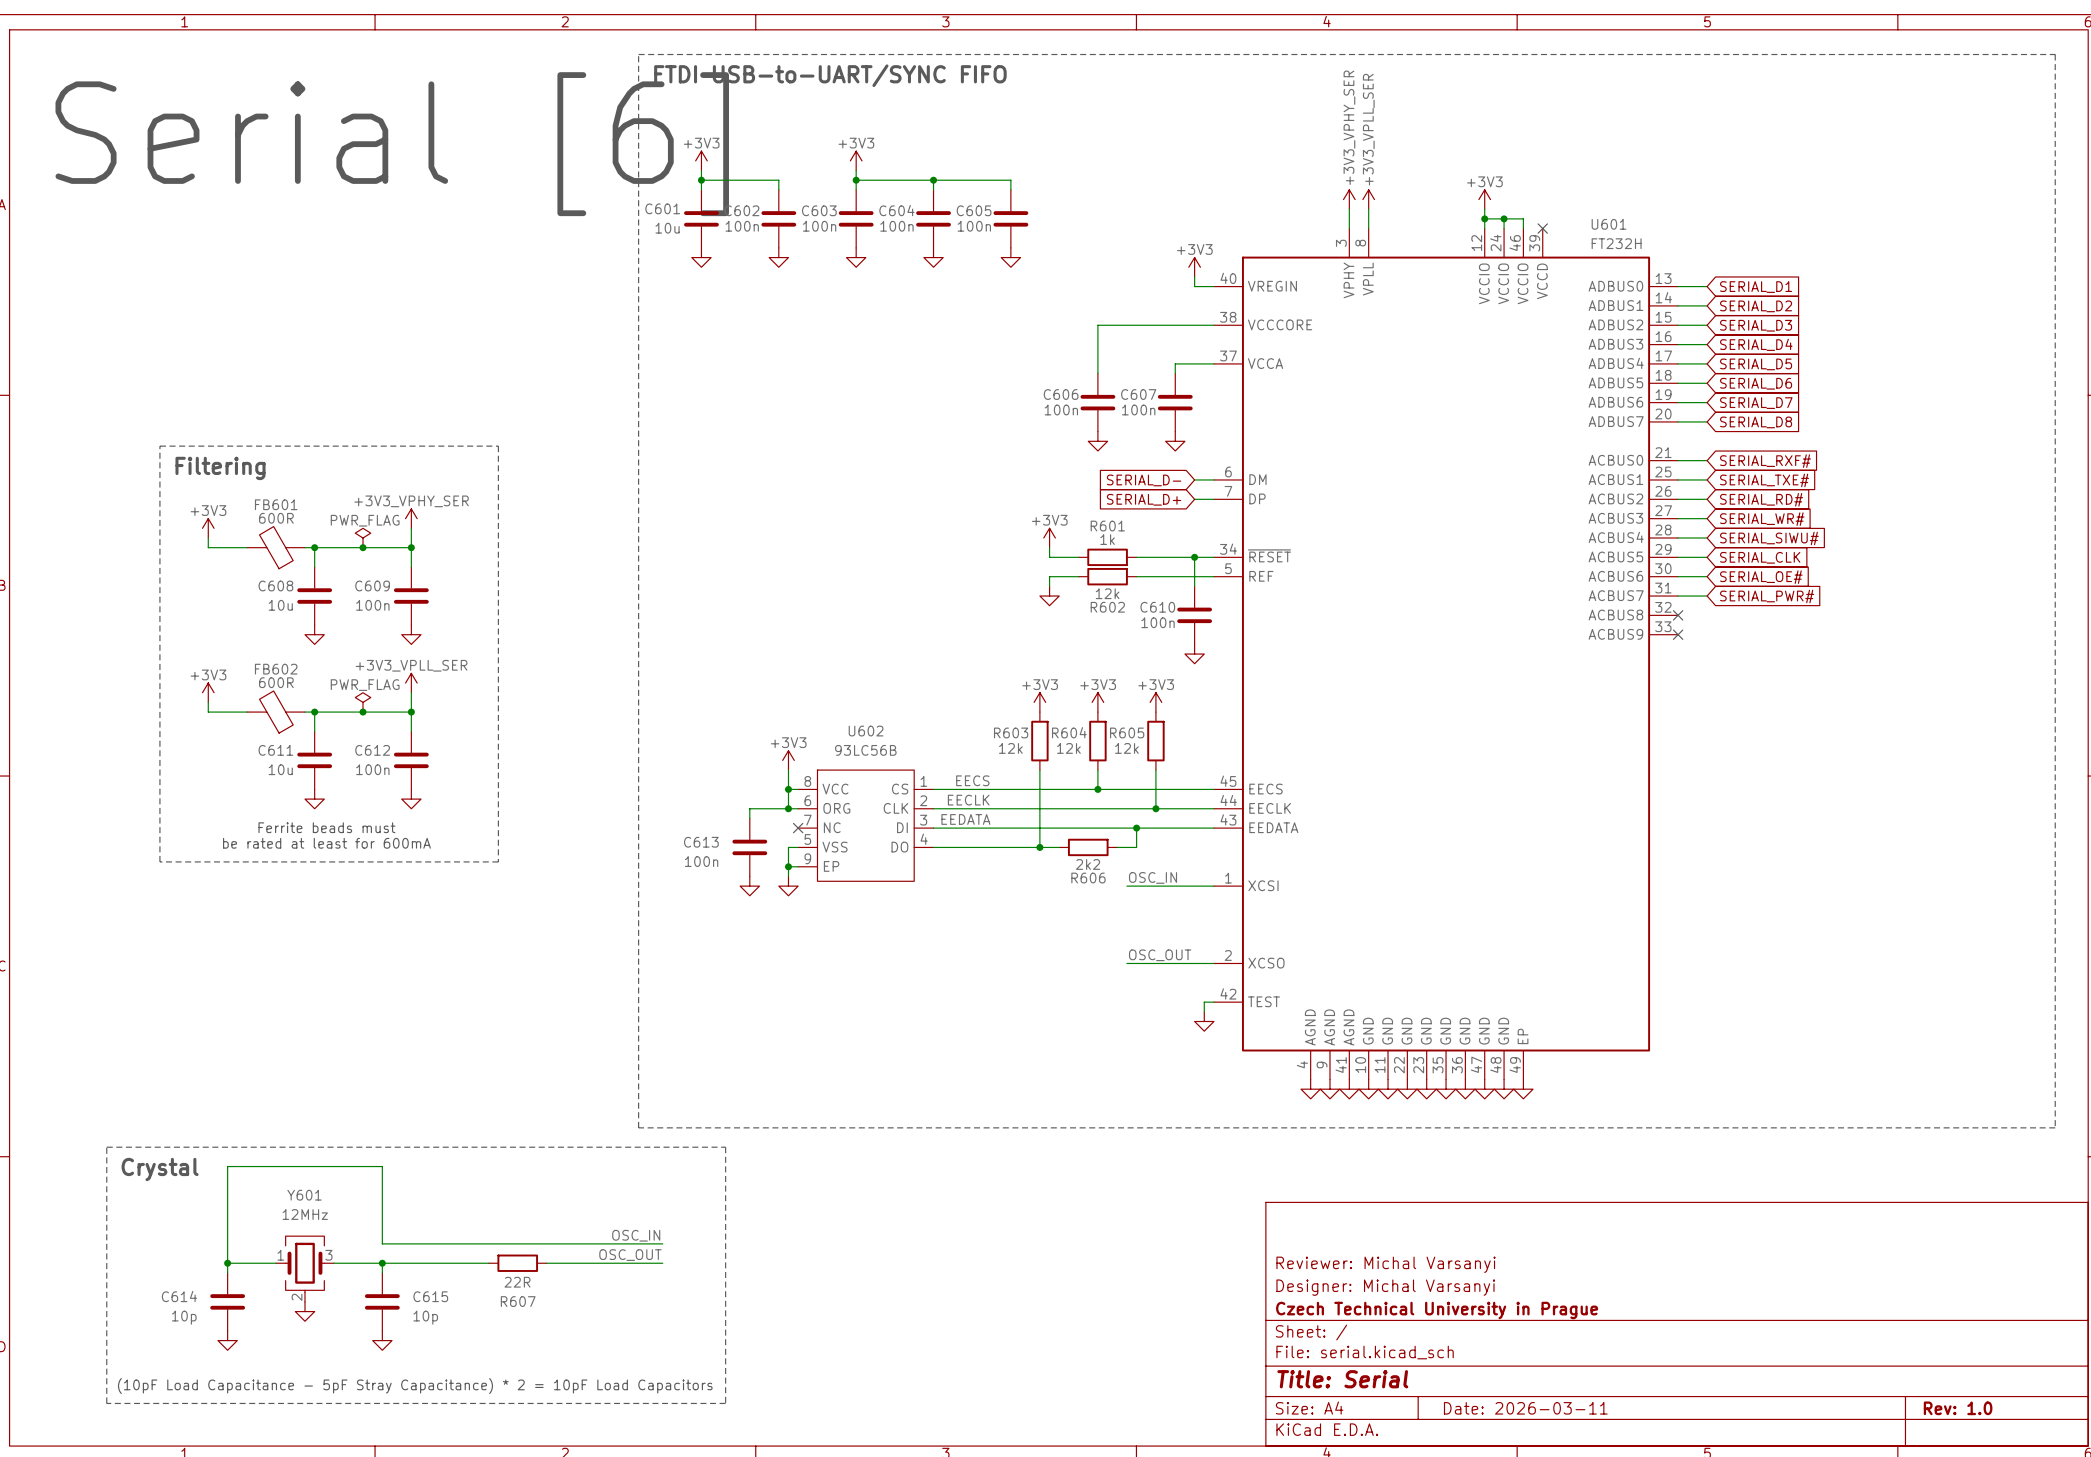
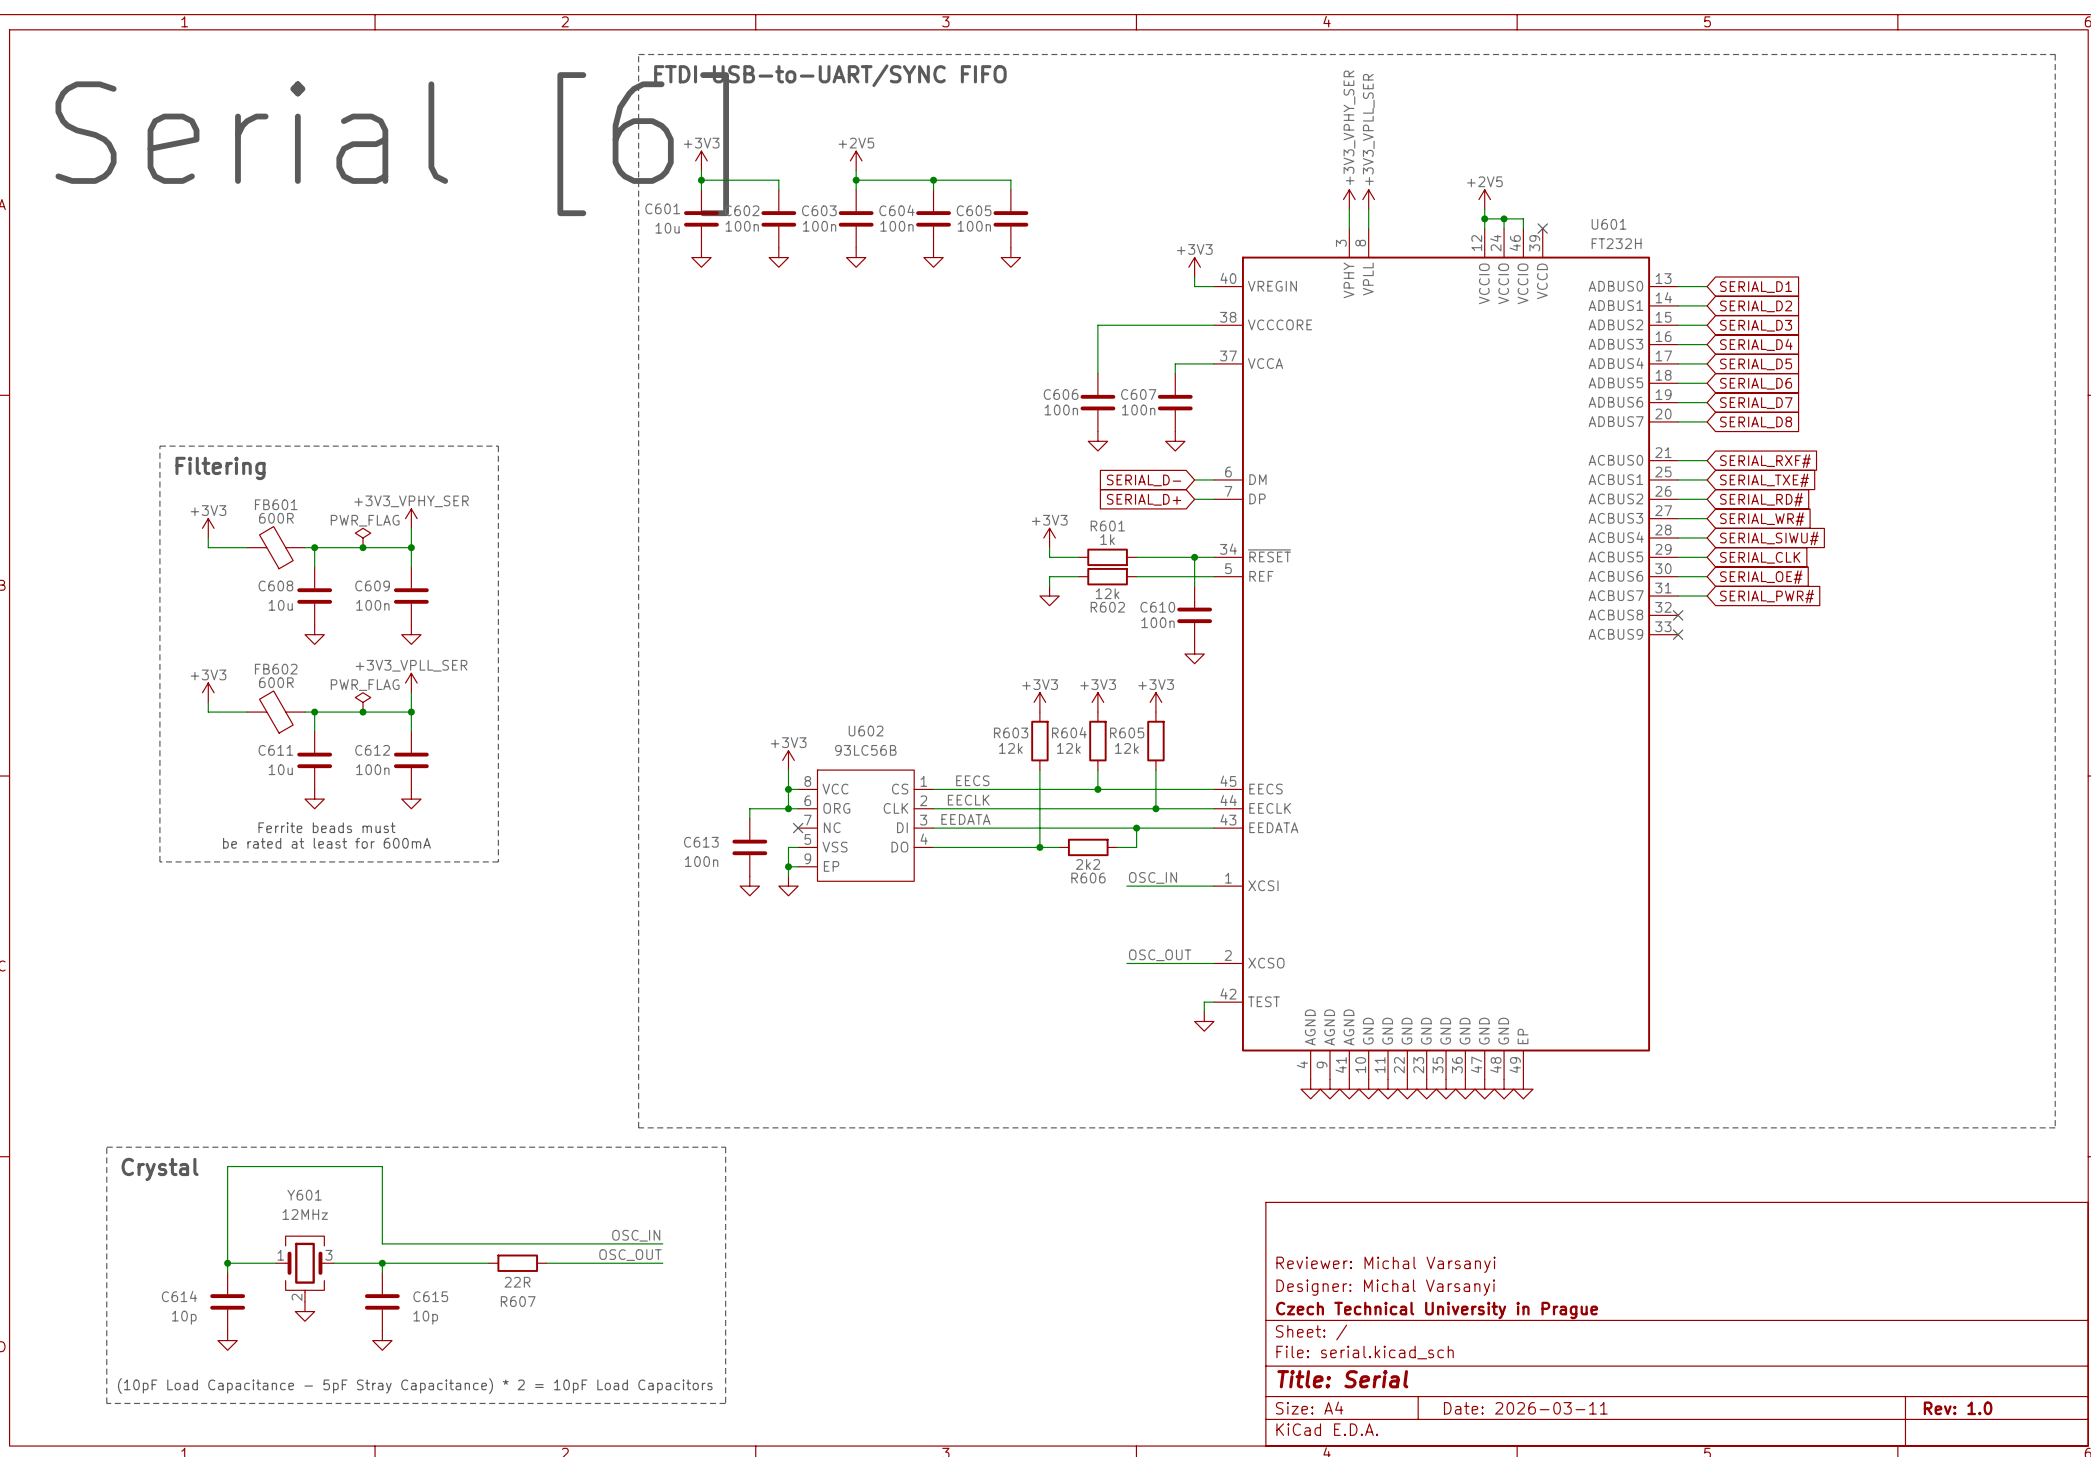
power symbol: +3V3 (856, 160) -> +2V5 (856, 160)
power symbol: +3V3 (1484, 199) -> +2V5 (1484, 199)

